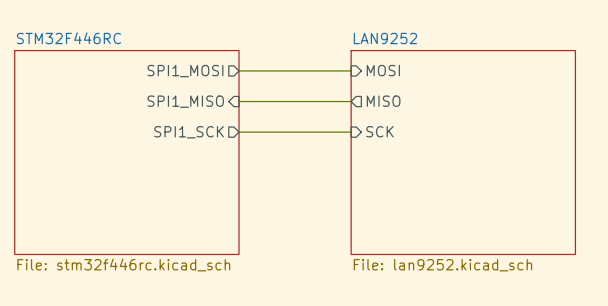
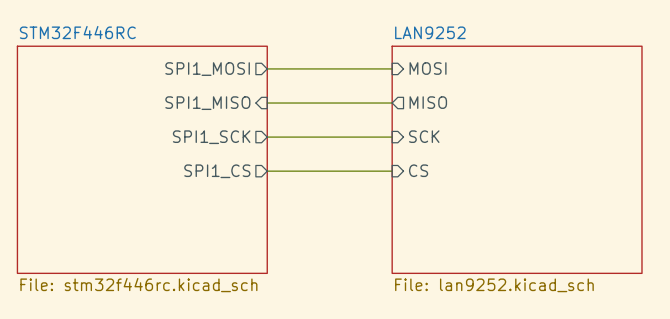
sheet pin: none -> SPI1_CS (217, 171)
wire: none -> (267, 171) (392, 171)
sheet pin: none -> CS (418, 170)

